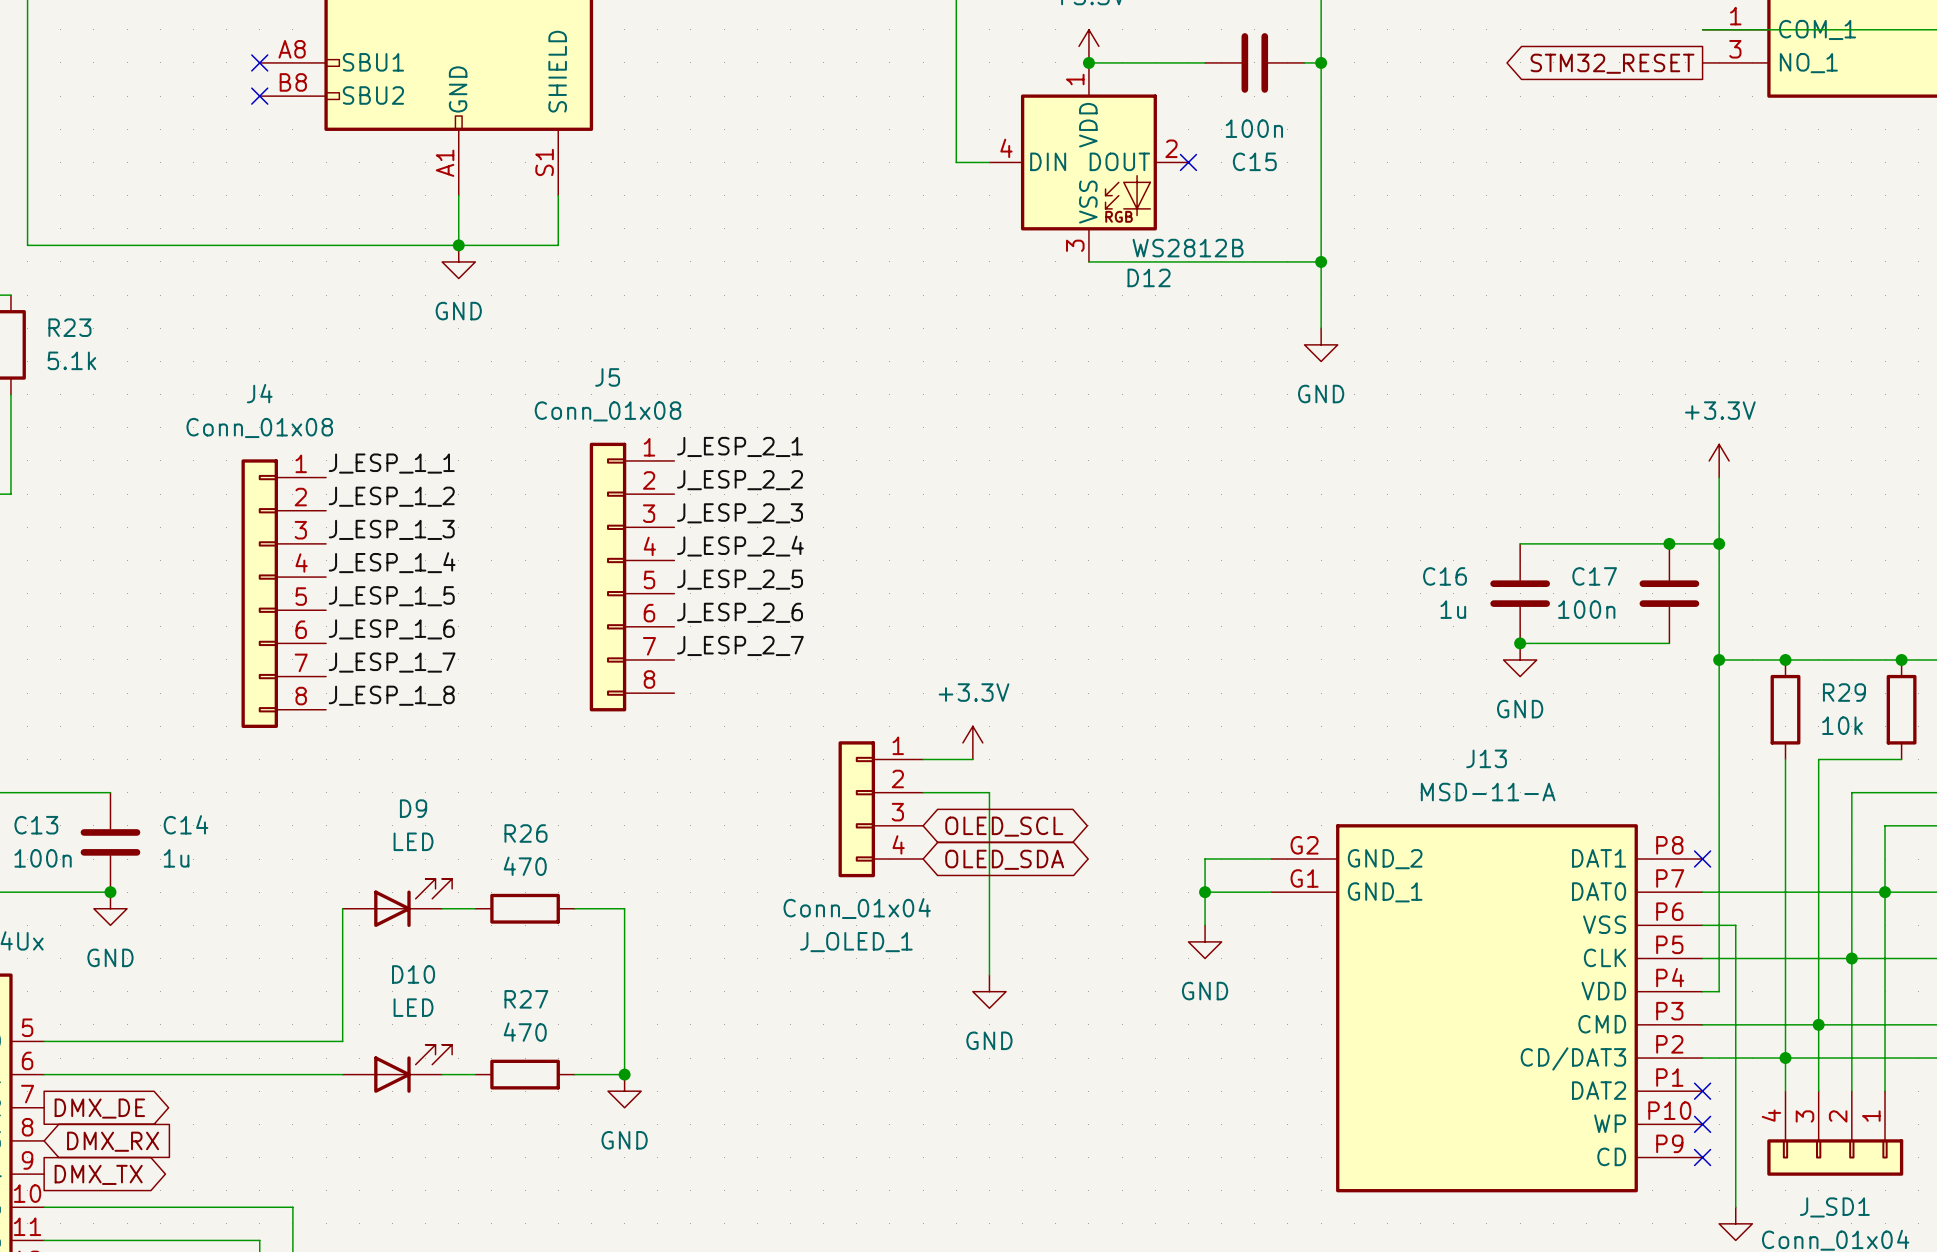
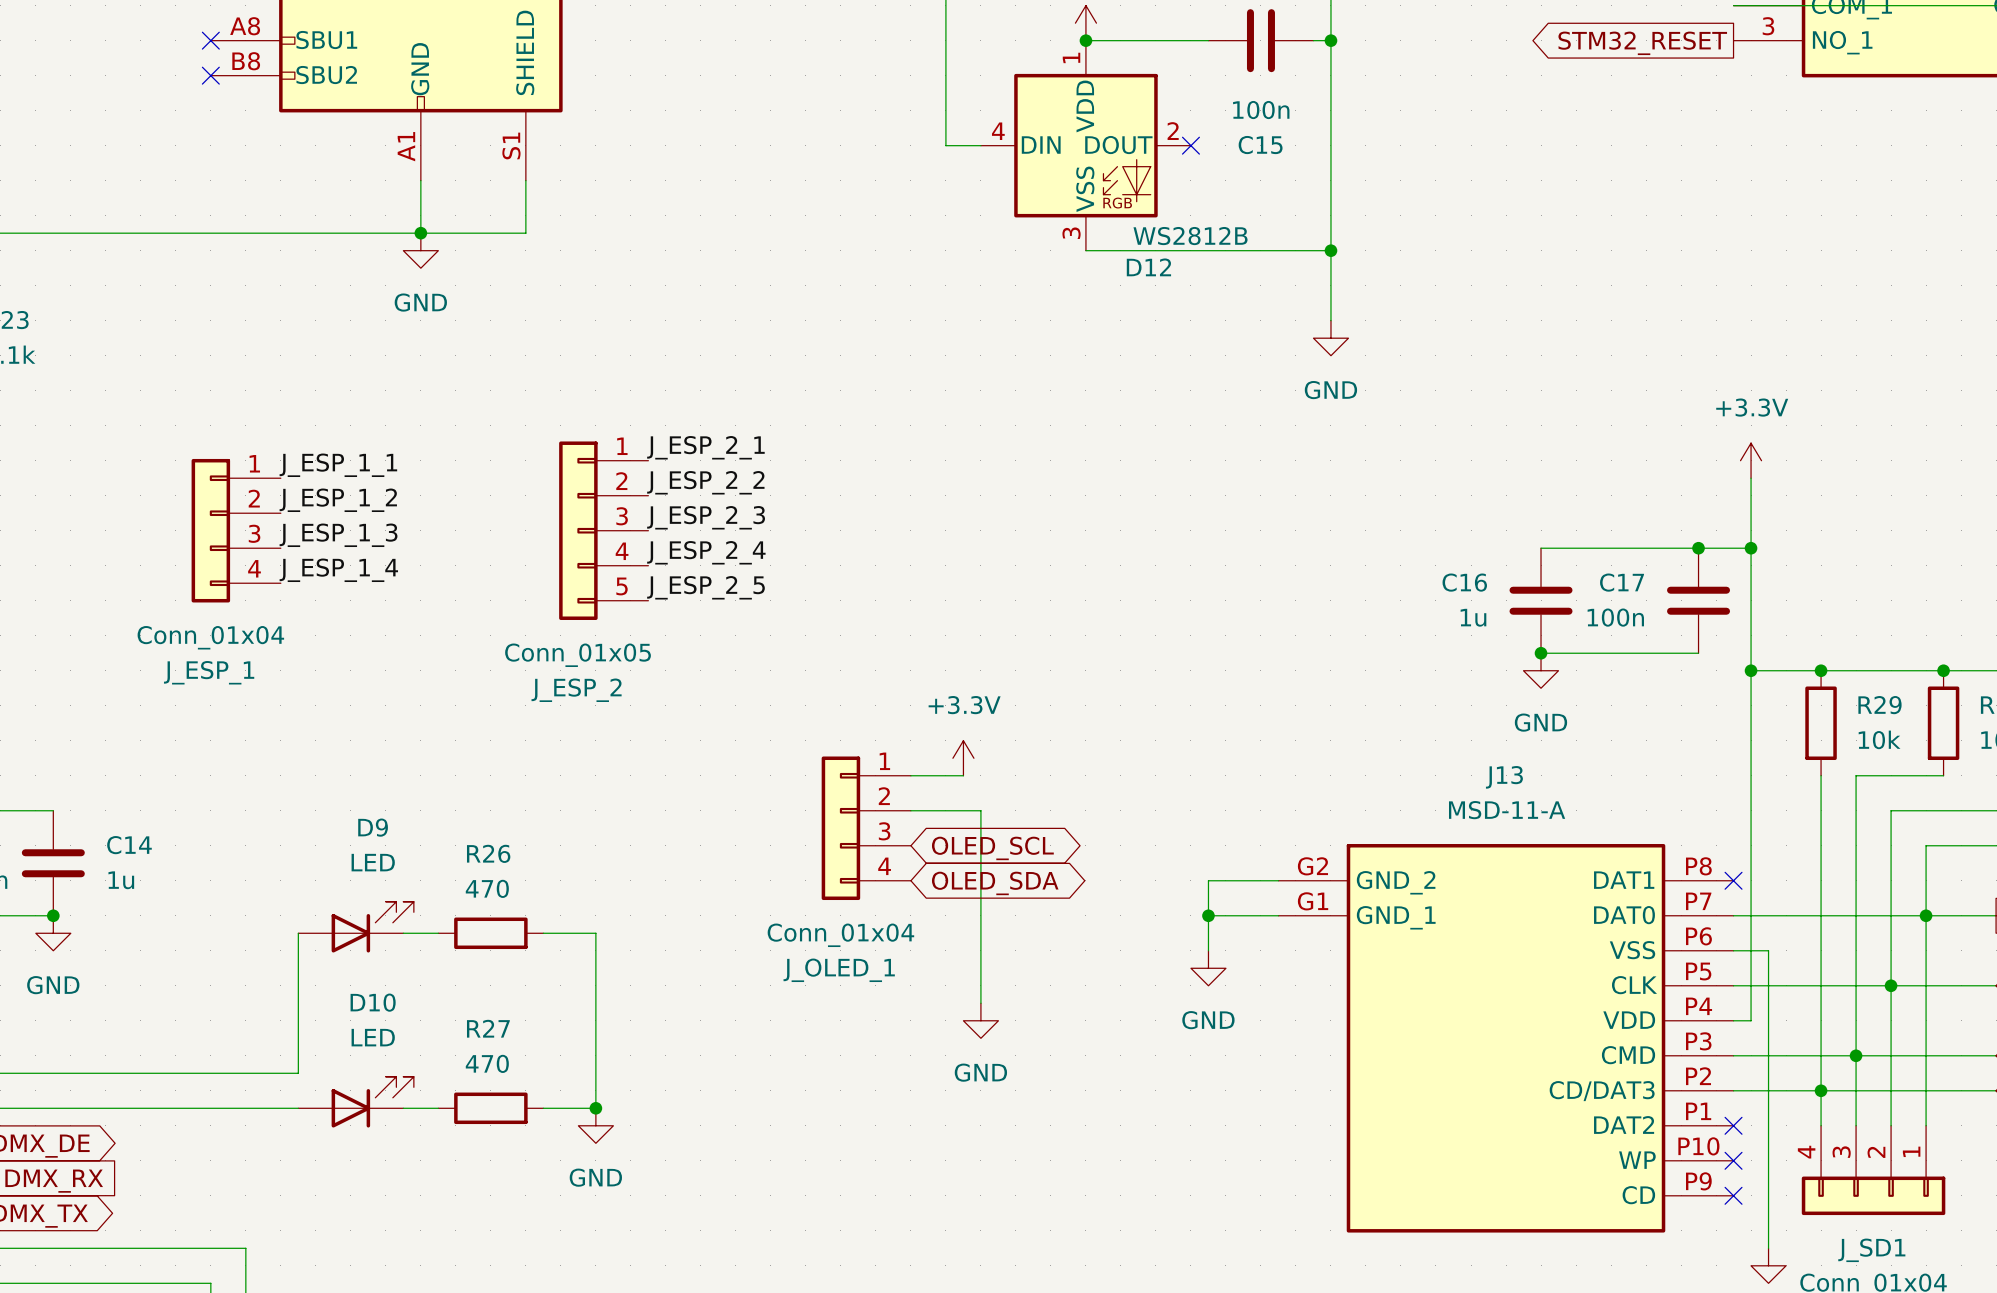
J_ESP_1: none -> Conn_01x04 (236, 530)
J_ESP_2: none -> Conn_01x05 (603, 530)
J5: Conn_01x08 (632, 577) -> none
J4: Conn_01x08 (283, 593) -> none
label: J_ESP_1_5 (391, 596) -> none
label: J_ESP_2_6 (740, 612) -> none
label: J_ESP_1_6 (391, 629) -> none
label: J_ESP_2_7 (740, 645) -> none
label: J_ESP_1_7 (392, 662) -> none
label: J_ESP_1_8 (391, 695) -> none

